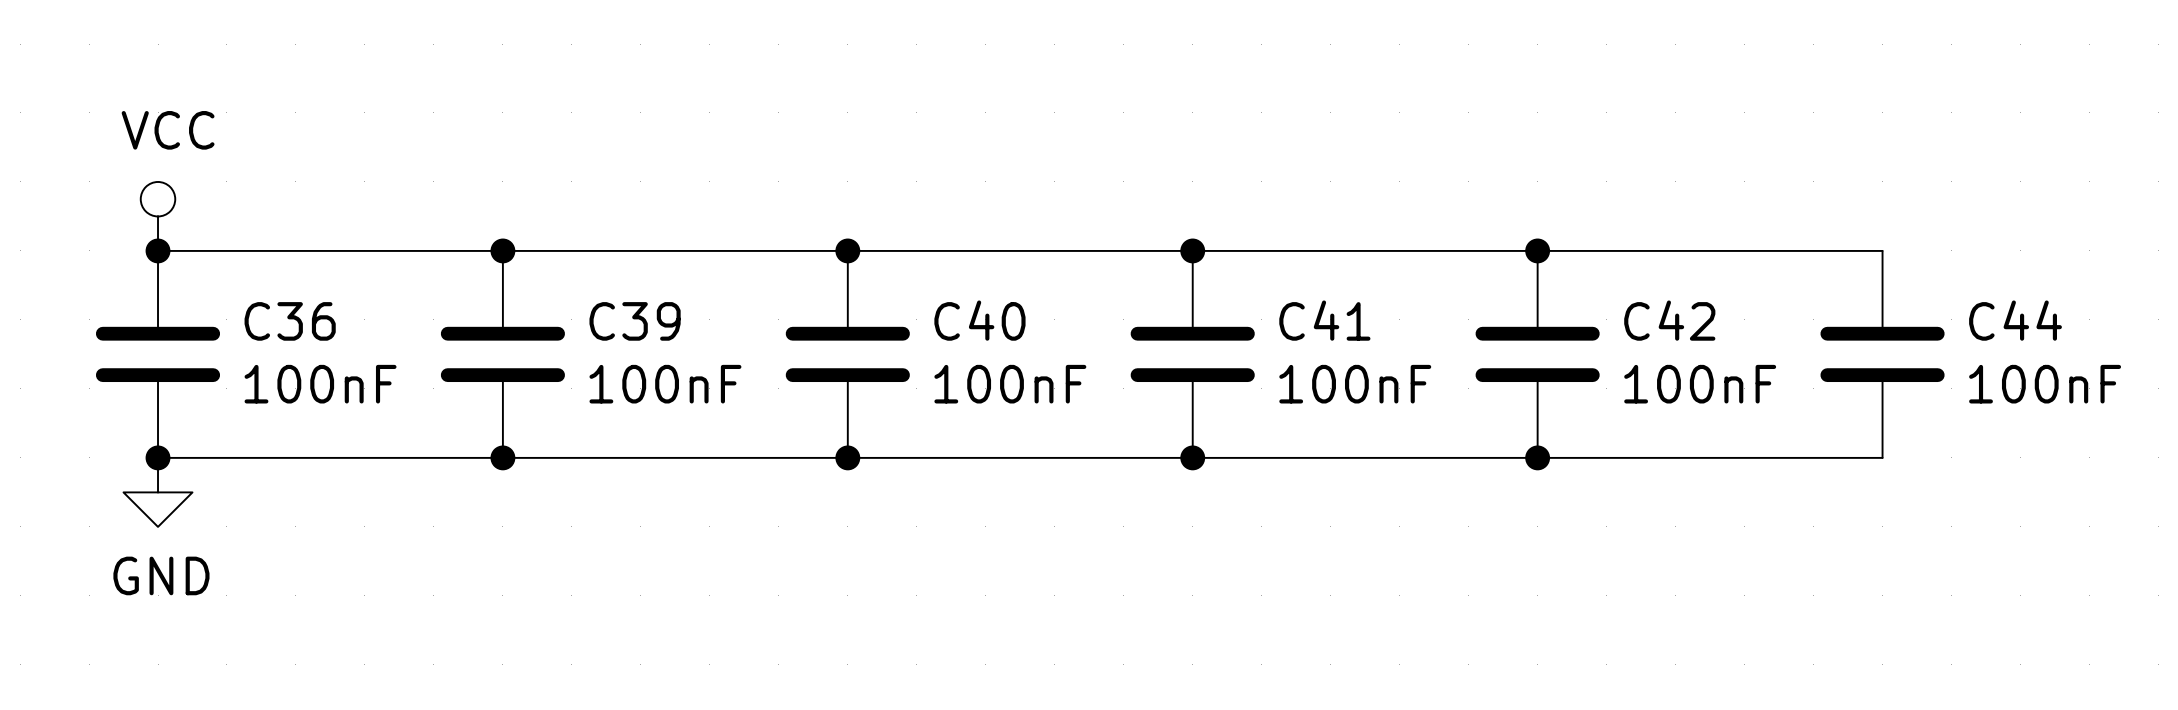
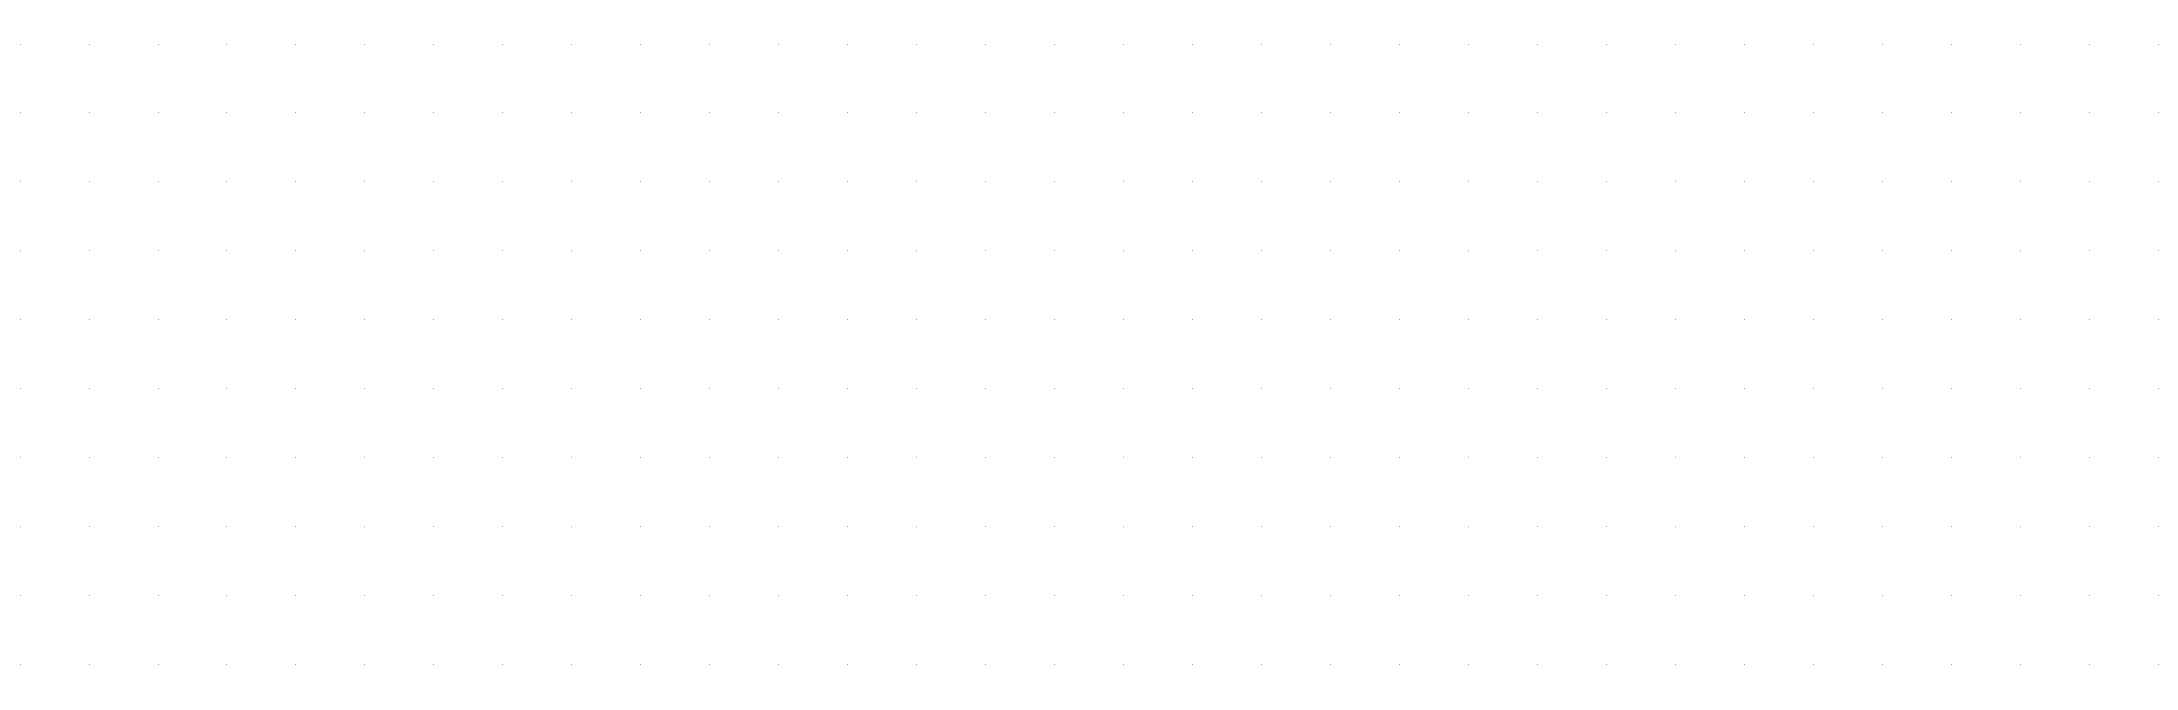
power symbol: VCC (158, 216) -> none
wire: (158, 250) (1882, 250) -> none
junction: (158, 250) -> none
junction: (502, 250) -> none
junction: (847, 250) -> none
junction: (1192, 250) -> none
junction: (1537, 250) -> none
C36: 100nF (158, 354) -> none
C39: 100nF (502, 354) -> none
C40: 100nF (847, 354) -> none
C41: 100nF (1192, 354) -> none
C42: 100nF (1537, 354) -> none
C44: 100nF (1882, 354) -> none
wire: (158, 457) (1882, 457) -> none
junction: (158, 457) -> none
junction: (502, 457) -> none
junction: (847, 457) -> none
junction: (1192, 457) -> none
junction: (1537, 457) -> none
power symbol: GND (158, 492) -> none

